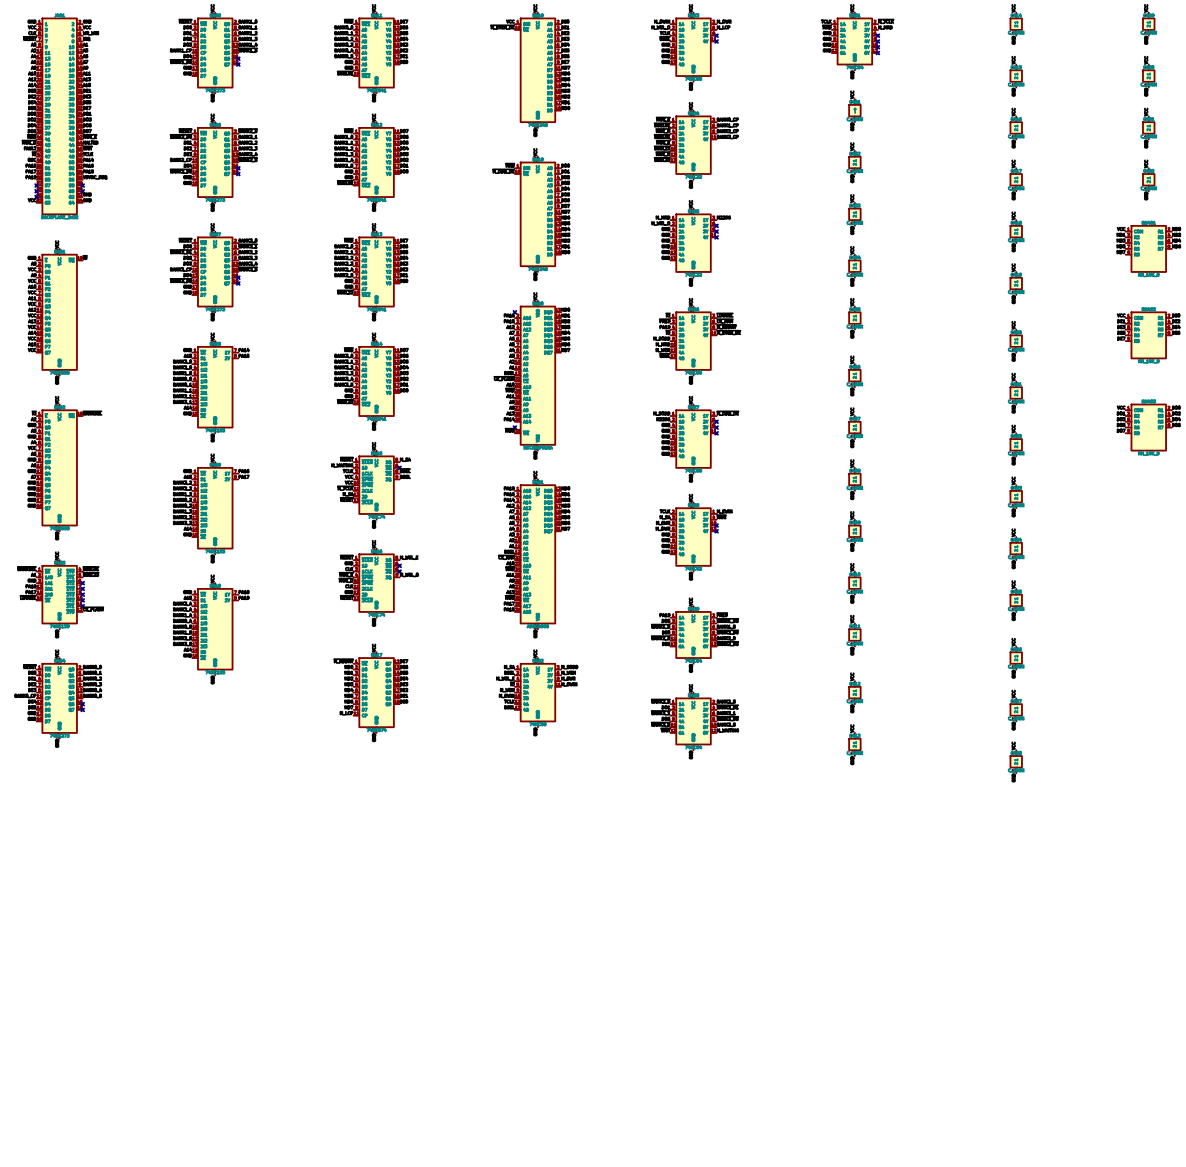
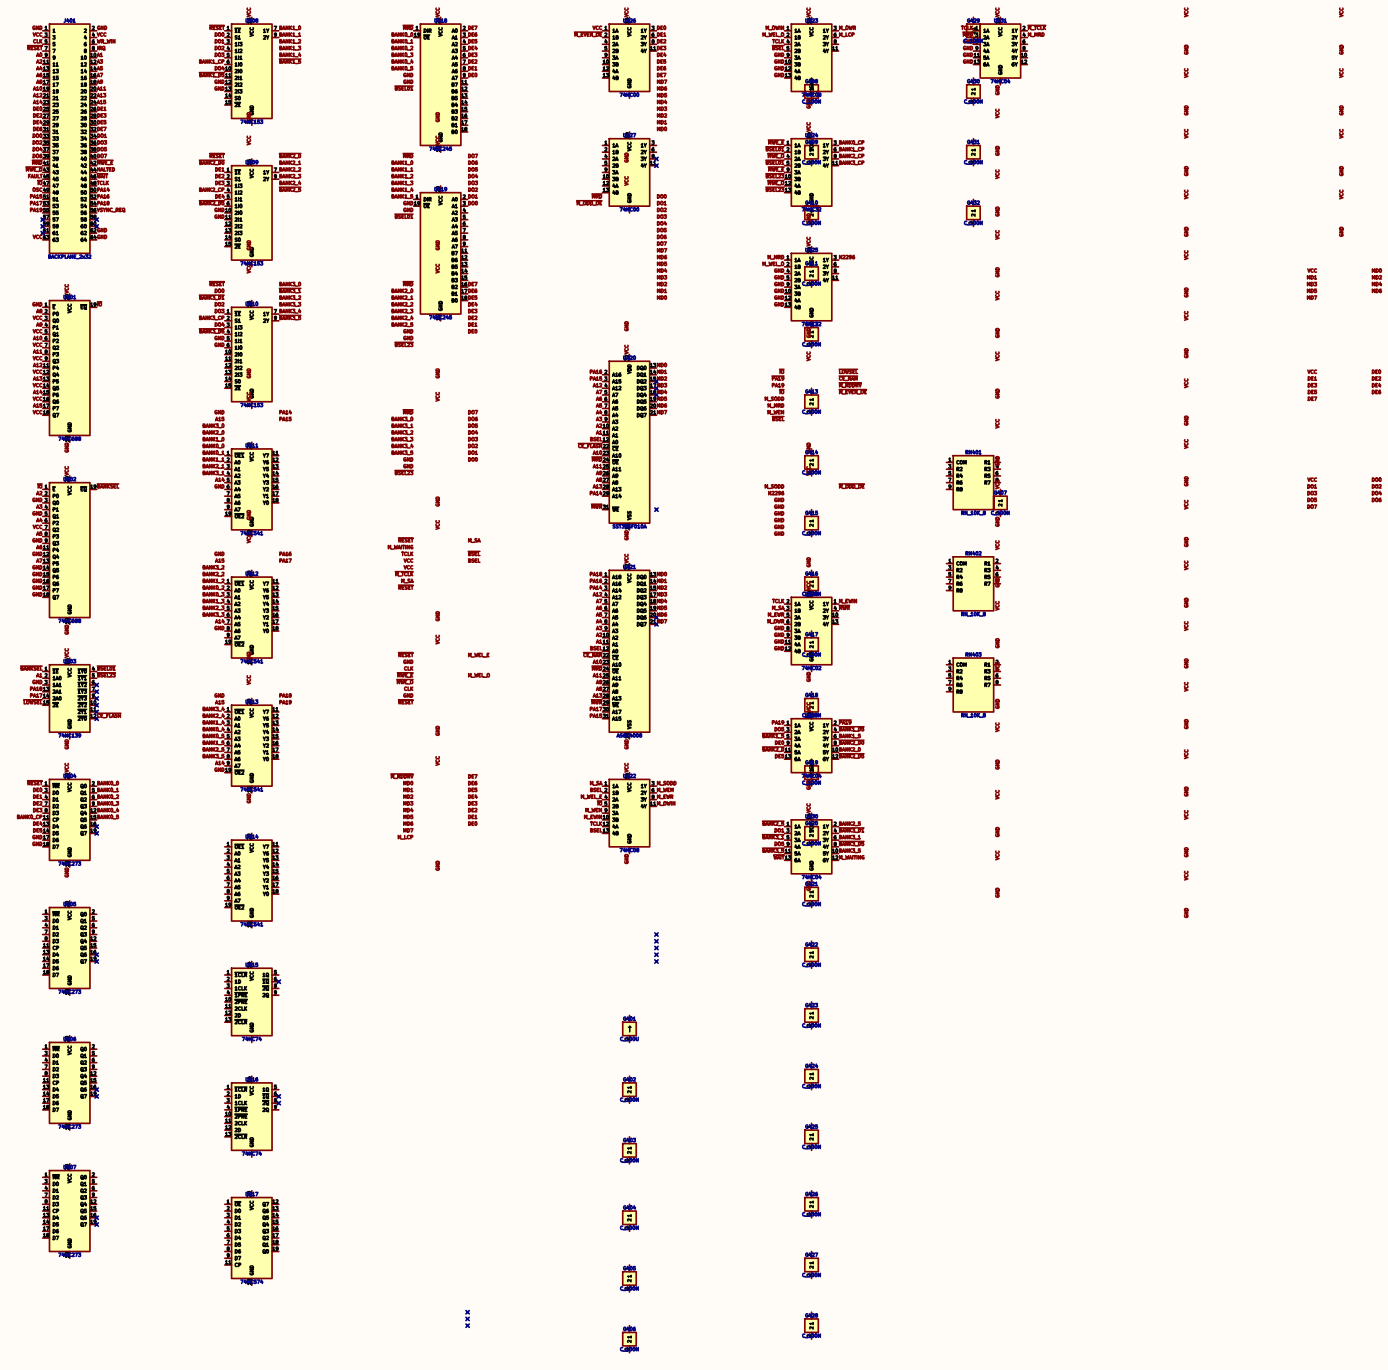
part position: (1016, 24) -> (811, 462)
part position: (1148, 24) -> (973, 30)
no-connect mark: (716, 35) -> none
no-connect mark: (877, 35) -> none
no-connect mark: (716, 41) -> none
no-connect mark: (877, 41) -> none
no-connect mark: (877, 47) -> none
part position: (215, 53) -> (69, 948)
part position: (376, 53) -> (251, 489)
no-connect mark: (877, 53) -> none
no-connect mark: (238, 58) -> none
no-connect mark: (238, 64) -> none
part position: (537, 70) -> (440, 84)
part position: (1016, 76) -> (811, 523)
part position: (1148, 76) -> (973, 91)
part position: (854, 110) -> (629, 1028)
part position: (1016, 127) -> (811, 583)
part position: (1148, 127) -> (973, 152)
no-connect mark: none -> (656, 158)
no-connect mark: none -> (656, 165)
part position: (215, 162) -> (69, 1082)
part position: (376, 162) -> (251, 617)
part position: (854, 162) -> (629, 1089)
no-connect mark: (238, 168) -> none
no-connect mark: (238, 174) -> none
part position: (1016, 179) -> (811, 644)
part position: (1148, 179) -> (973, 212)
part position: (537, 214) -> (440, 253)
part position: (854, 214) -> (629, 1150)
no-connect mark: (716, 225) -> none
no-connect mark: (716, 231) -> none
part position: (1016, 231) -> (811, 705)
no-connect mark: (716, 237) -> none
part position: (1148, 248) -> (973, 482)
part position: (854, 266) -> (629, 1217)
part position: (215, 271) -> (69, 1211)
part position: (376, 271) -> (251, 745)
no-connect mark: (238, 277) -> none
no-connect mark: (238, 283) -> none
part position: (1016, 283) -> (811, 772)
no-connect mark: (514, 312) -> none
part position: (854, 318) -> (629, 1278)
no-connect mark: none -> (656, 381)
no-connect mark: none -> (656, 388)
no-connect mark: none -> (656, 394)
part position: (1148, 335) -> (973, 583)
part position: (693, 341) -> (629, 57)
part position: (1016, 341) -> (811, 833)
part position: (854, 375) -> (629, 1339)
part position: (376, 381) -> (251, 880)
part position: (215, 387) -> (251, 71)
part position: (1016, 392) -> (811, 894)
no-connect mark: (716, 421) -> none
no-connect mark: (514, 427) -> none
no-connect mark: (716, 427) -> none
part position: (1148, 427) -> (973, 684)
no-connect mark: none -> (656, 509)
no-connect mark: (716, 433) -> none
part position: (693, 439) -> (629, 172)
part position: (1016, 444) -> (811, 954)
no-connect mark: (399, 467) -> none
part position: (854, 479) -> (811, 91)
part position: (376, 485) -> (251, 1001)
part position: (1016, 496) -> (811, 1015)
part position: (215, 508) -> (251, 212)
no-connect mark: none -> (656, 617)
no-connect mark: (716, 525) -> none
no-connect mark: none -> (656, 624)
no-connect mark: (716, 531) -> none
part position: (854, 531) -> (811, 152)
part position: (1016, 548) -> (811, 1076)
no-connect mark: (399, 565) -> none
no-connect mark: (399, 571) -> none
part position: (376, 583) -> (251, 1116)
part position: (854, 583) -> (811, 212)
part position: (1016, 600) -> (811, 1136)
no-connect mark: none -> (96, 718)
part position: (215, 629) -> (251, 354)
part position: (854, 635) -> (811, 273)
part position: (1016, 658) -> (811, 1204)
part position: (376, 692) -> (251, 1238)
part position: (854, 692) -> (811, 334)
part position: (1016, 709) -> (811, 1264)
part position: (854, 744) -> (811, 401)
part position: (1016, 761) -> (811, 1325)
no-connect mark: none -> (656, 934)
no-connect mark: none -> (656, 941)
no-connect mark: none -> (656, 948)
no-connect mark: none -> (96, 954)
no-connect mark: none -> (656, 954)
no-connect mark: none -> (96, 961)
no-connect mark: none -> (656, 961)
no-connect mark: none -> (278, 981)
no-connect mark: none -> (96, 1089)
no-connect mark: none -> (96, 1096)
no-connect mark: none -> (278, 1096)
no-connect mark: none -> (278, 1103)
no-connect mark: none -> (96, 1217)
no-connect mark: none -> (96, 1224)
no-connect mark: none -> (467, 1312)
no-connect mark: none -> (467, 1318)
no-connect mark: none -> (467, 1325)

